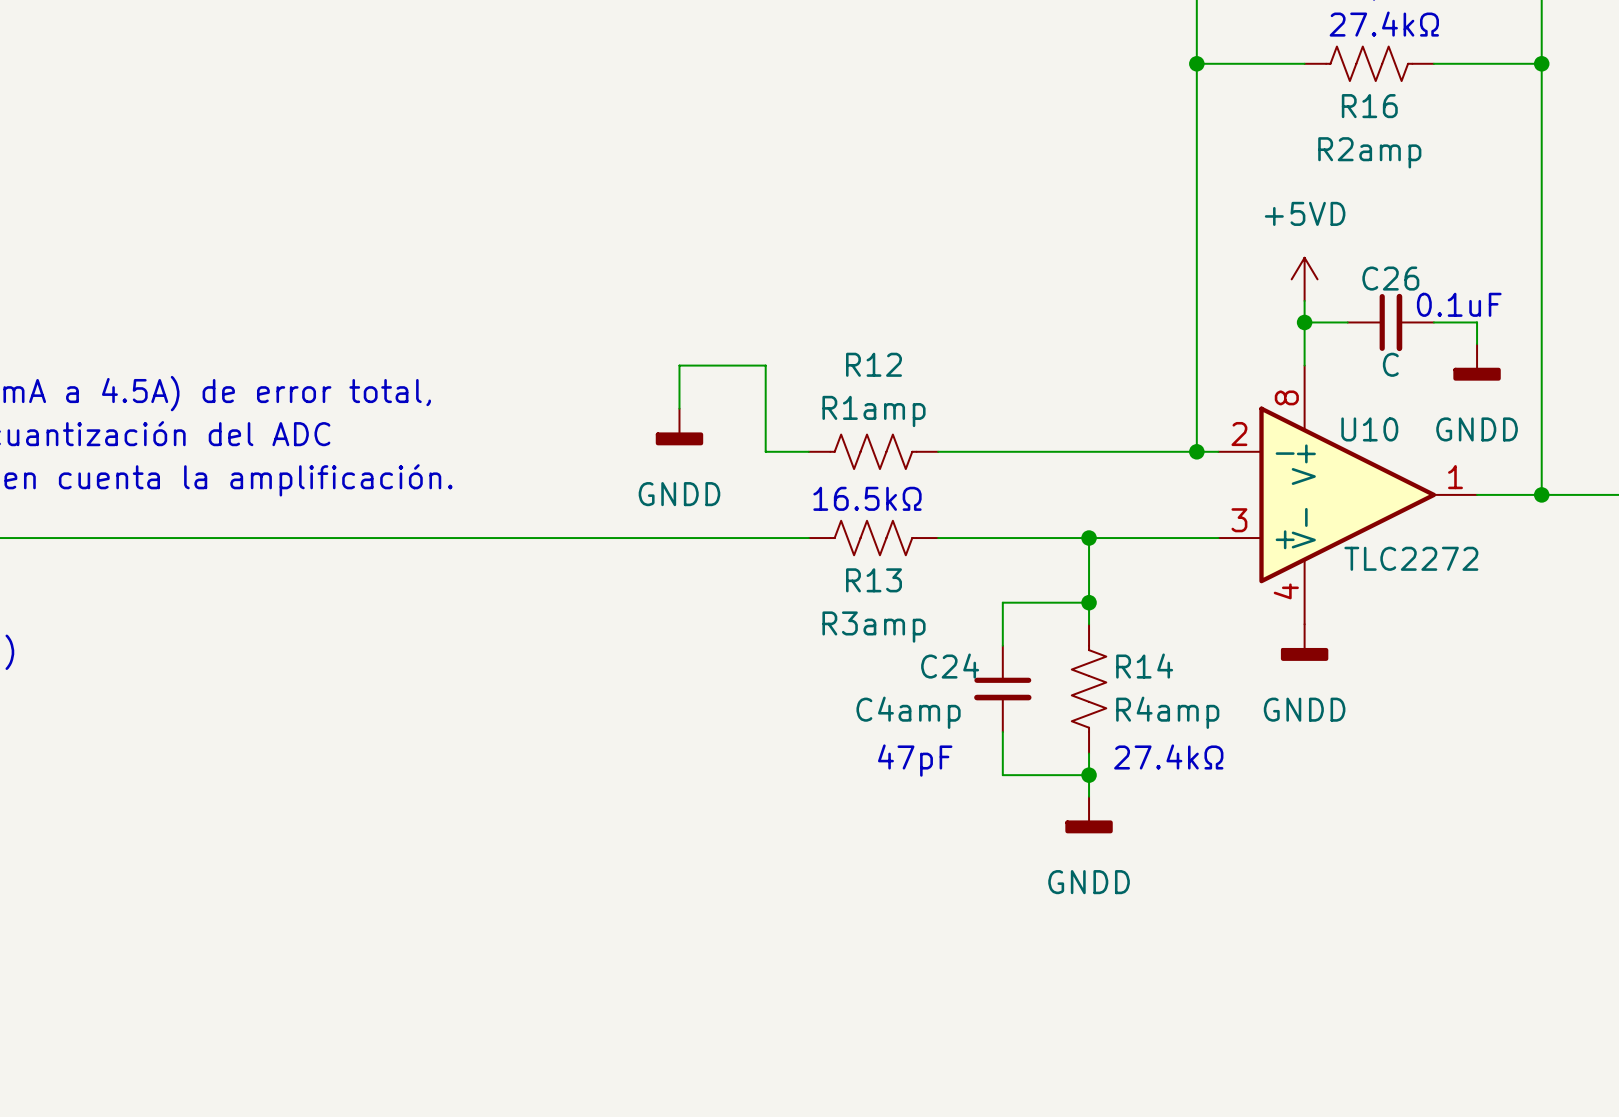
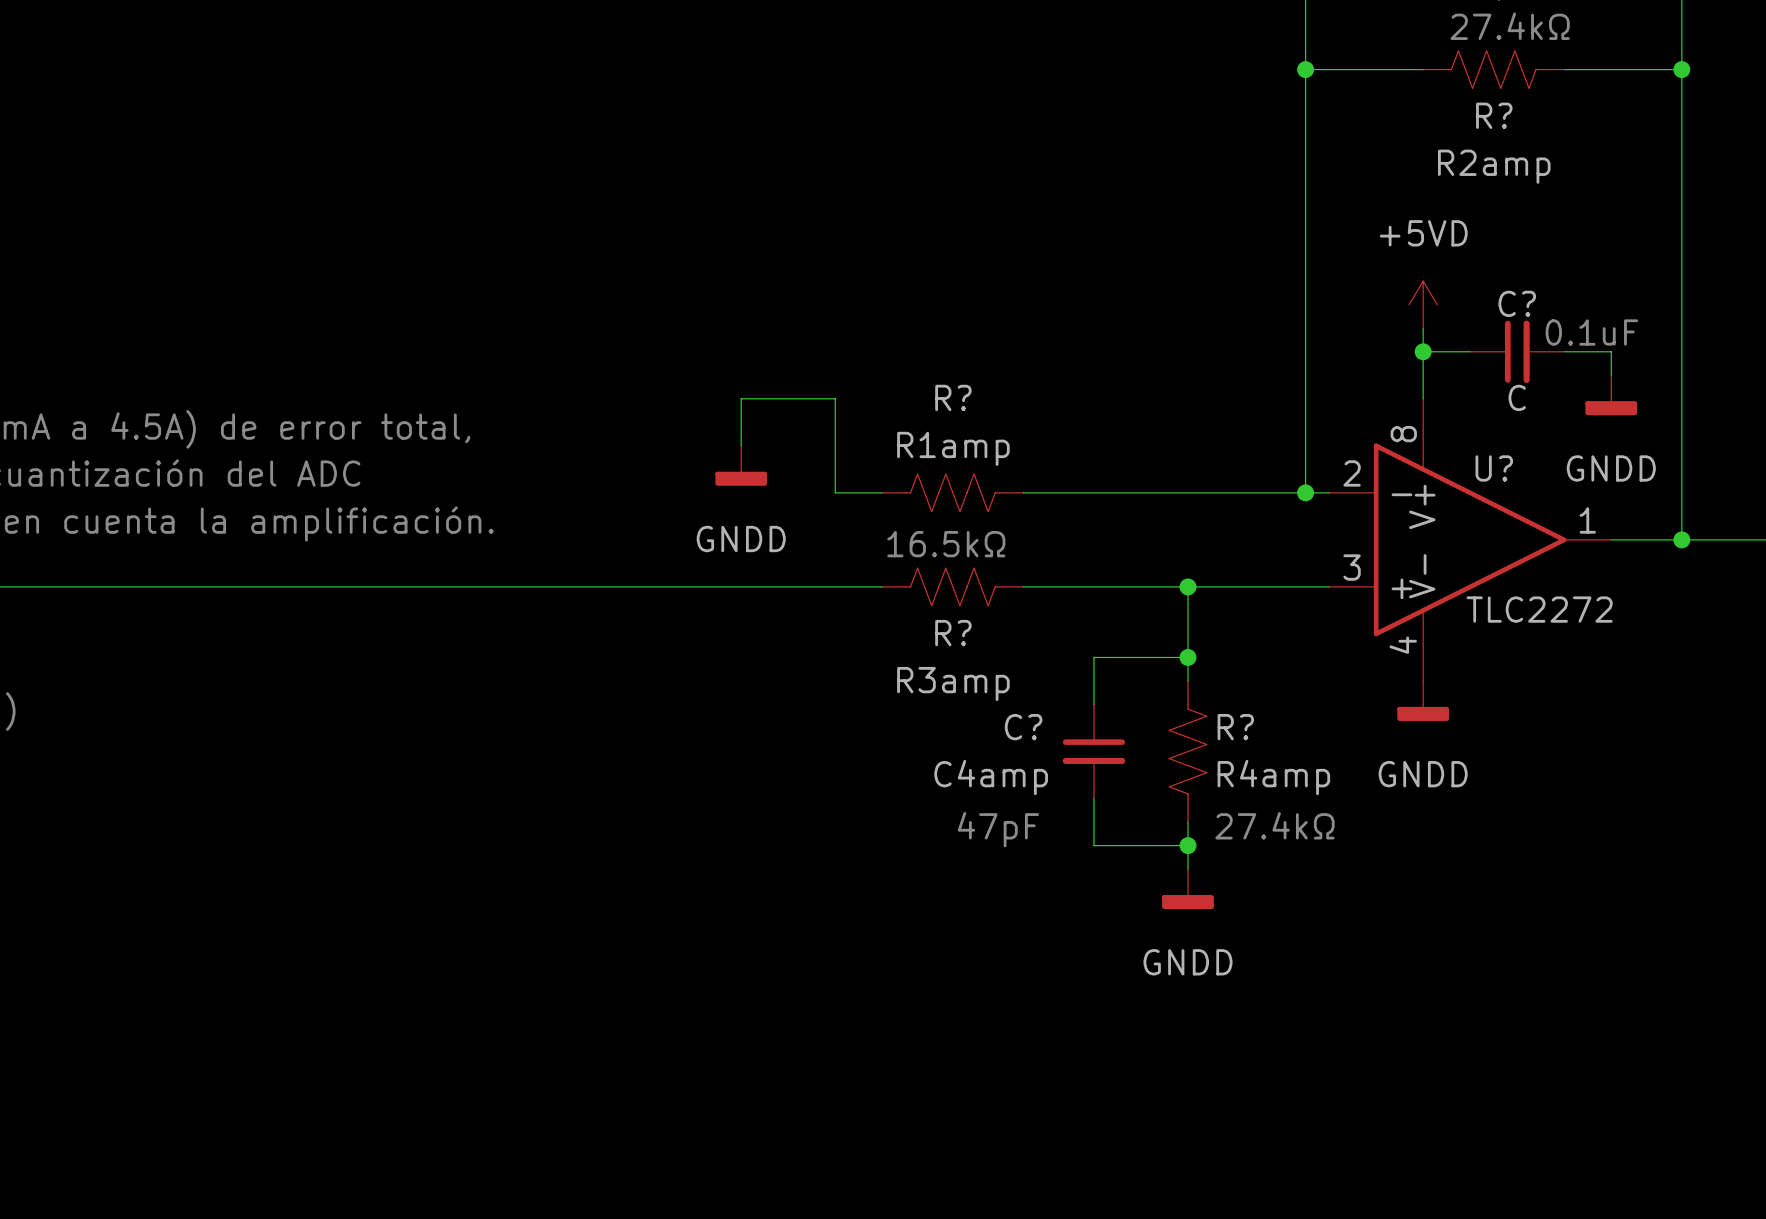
R16 name: R16 (1369, 106) -> R? (1494, 115)
C26 name: C26 (1390, 278) -> C? (1517, 303)
R12 name: R12 (874, 364) -> R? (953, 397)
U10 name: U10 (1369, 429) -> U? (1494, 468)
R13 name: R13 (874, 580) -> R? (953, 633)
C24 name: C24 (950, 666) -> C? (1023, 727)
R14 name: R14 (1144, 666) -> R? (1235, 727)

